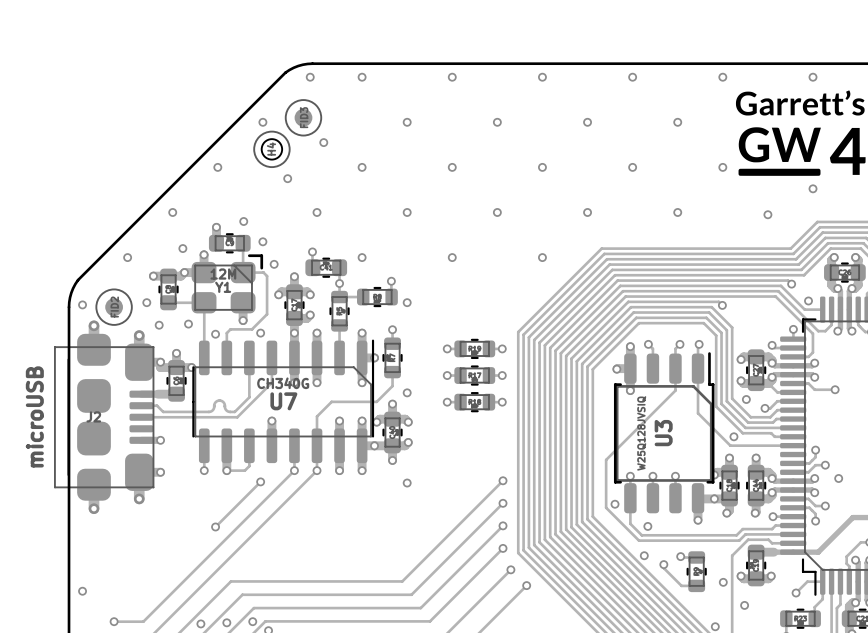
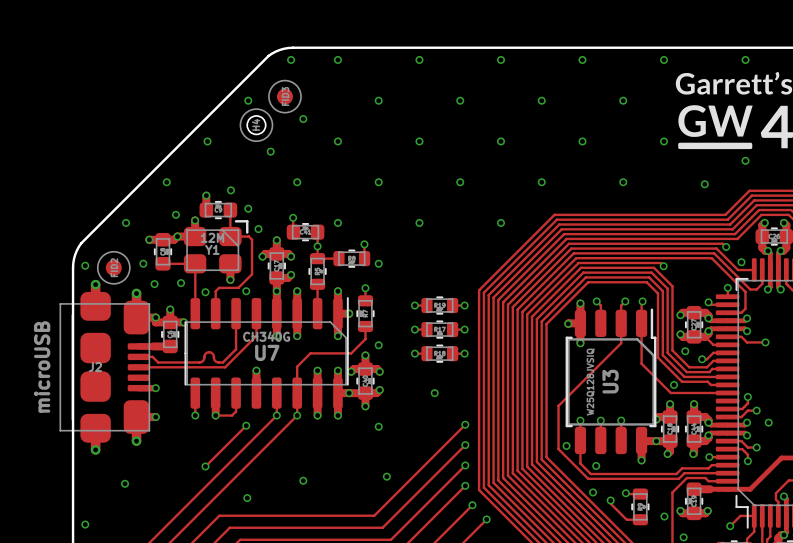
via: none -> (434, 393)
via: none -> (386, 476)
via: none -> (303, 480)
via: none -> (125, 483)
via: none -> (247, 498)

